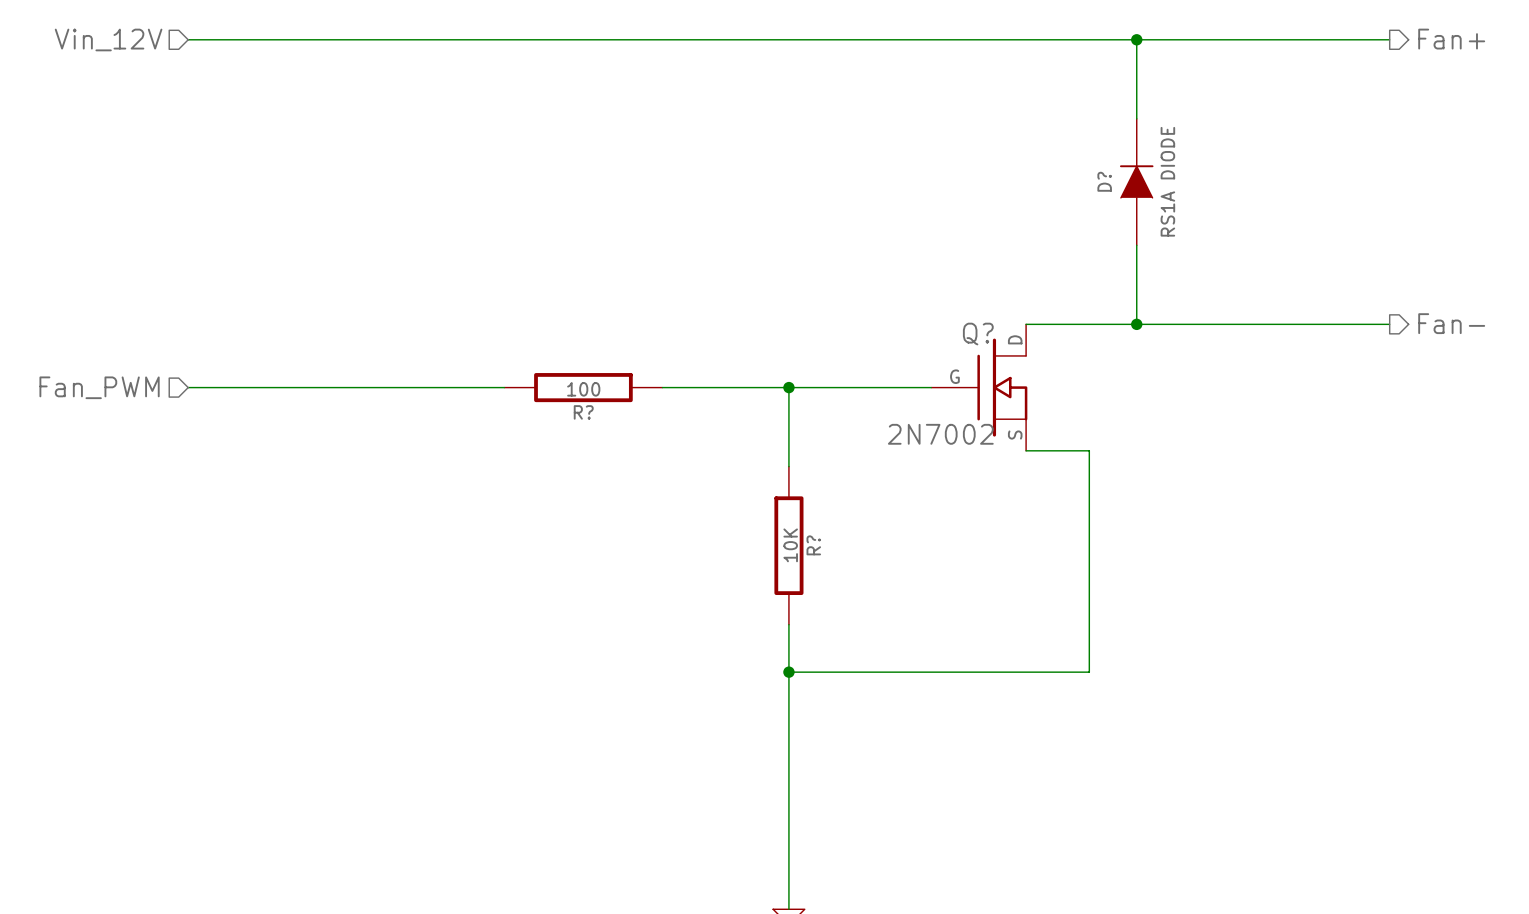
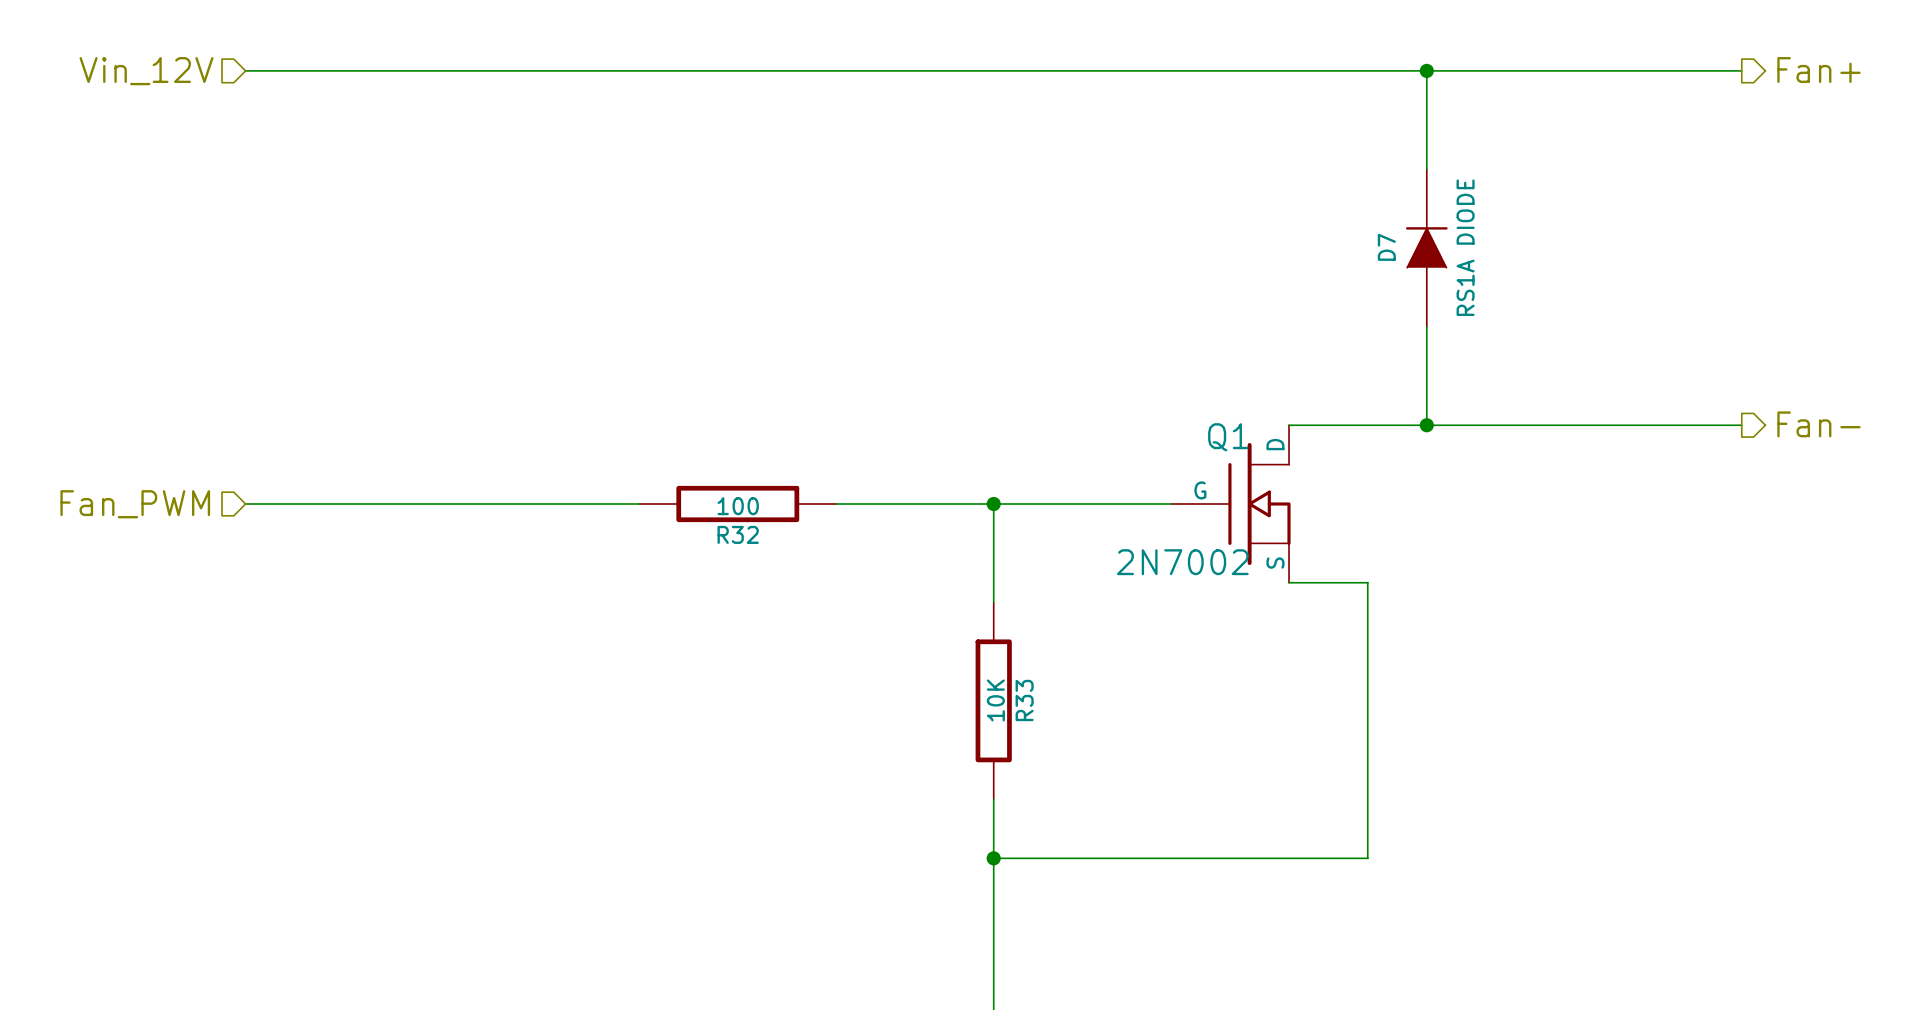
D? name: D? (1104, 181) -> D7 (1386, 247)
Q? name: Q? (978, 334) -> Q1 (1228, 437)
R? name: R? (583, 412) -> R32 (738, 534)
R? name: R? (813, 545) -> R33 (1024, 700)

